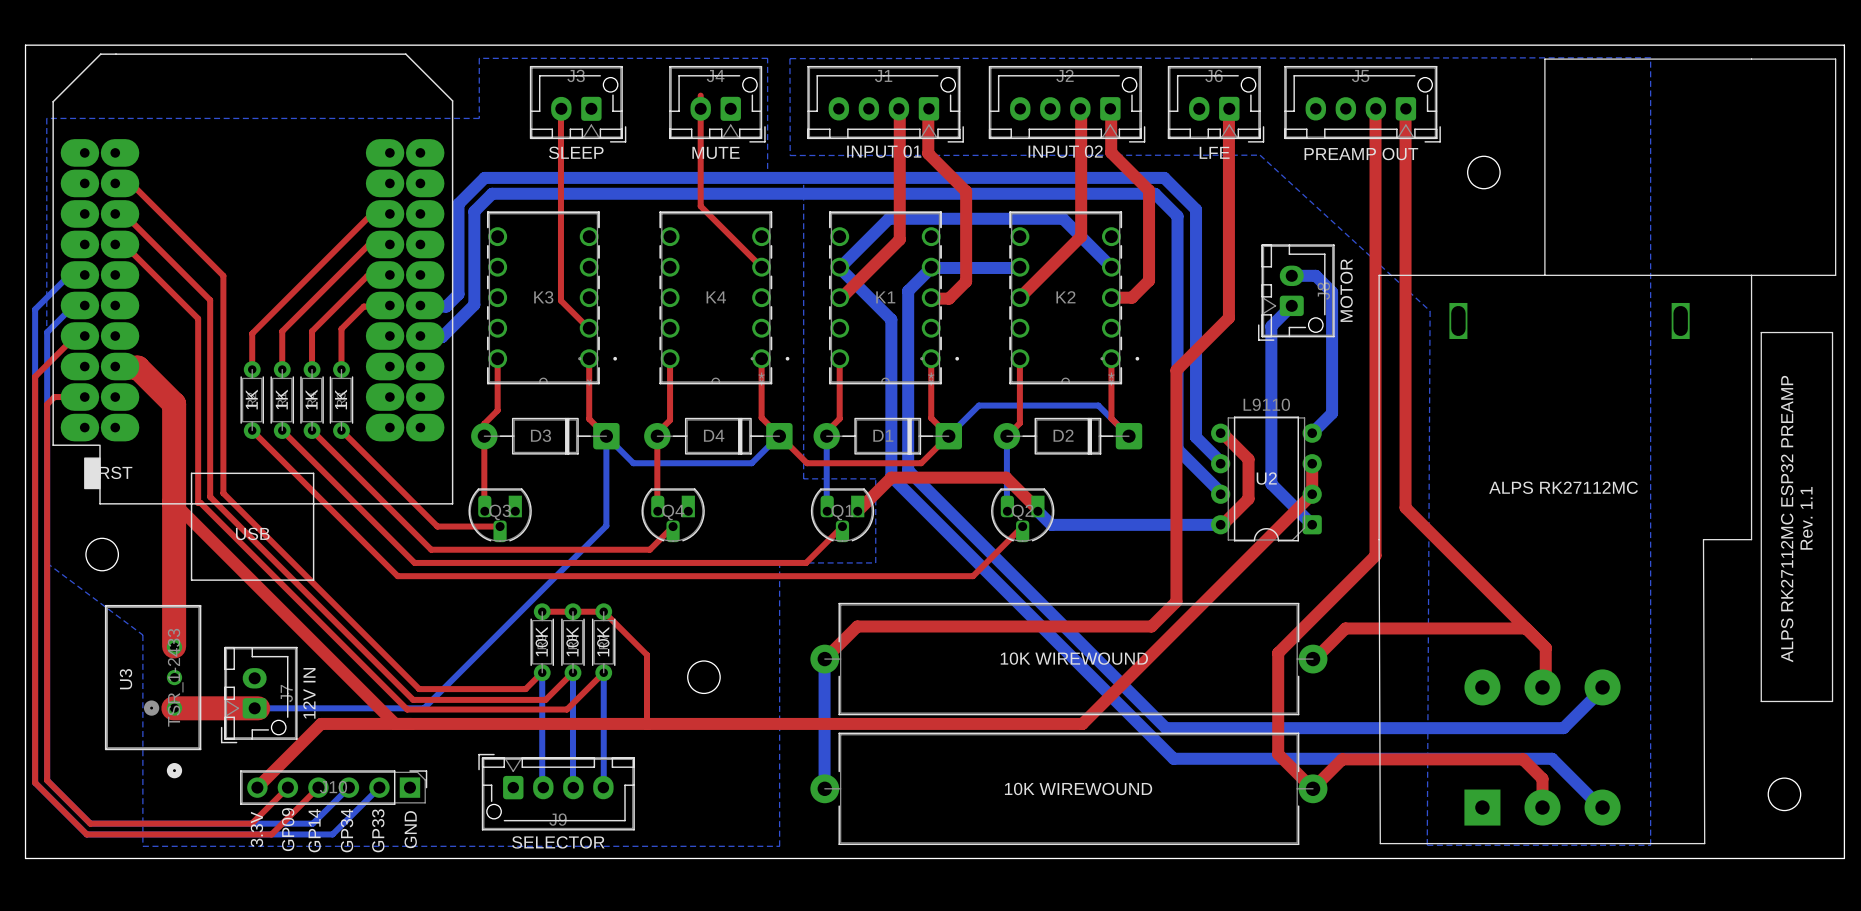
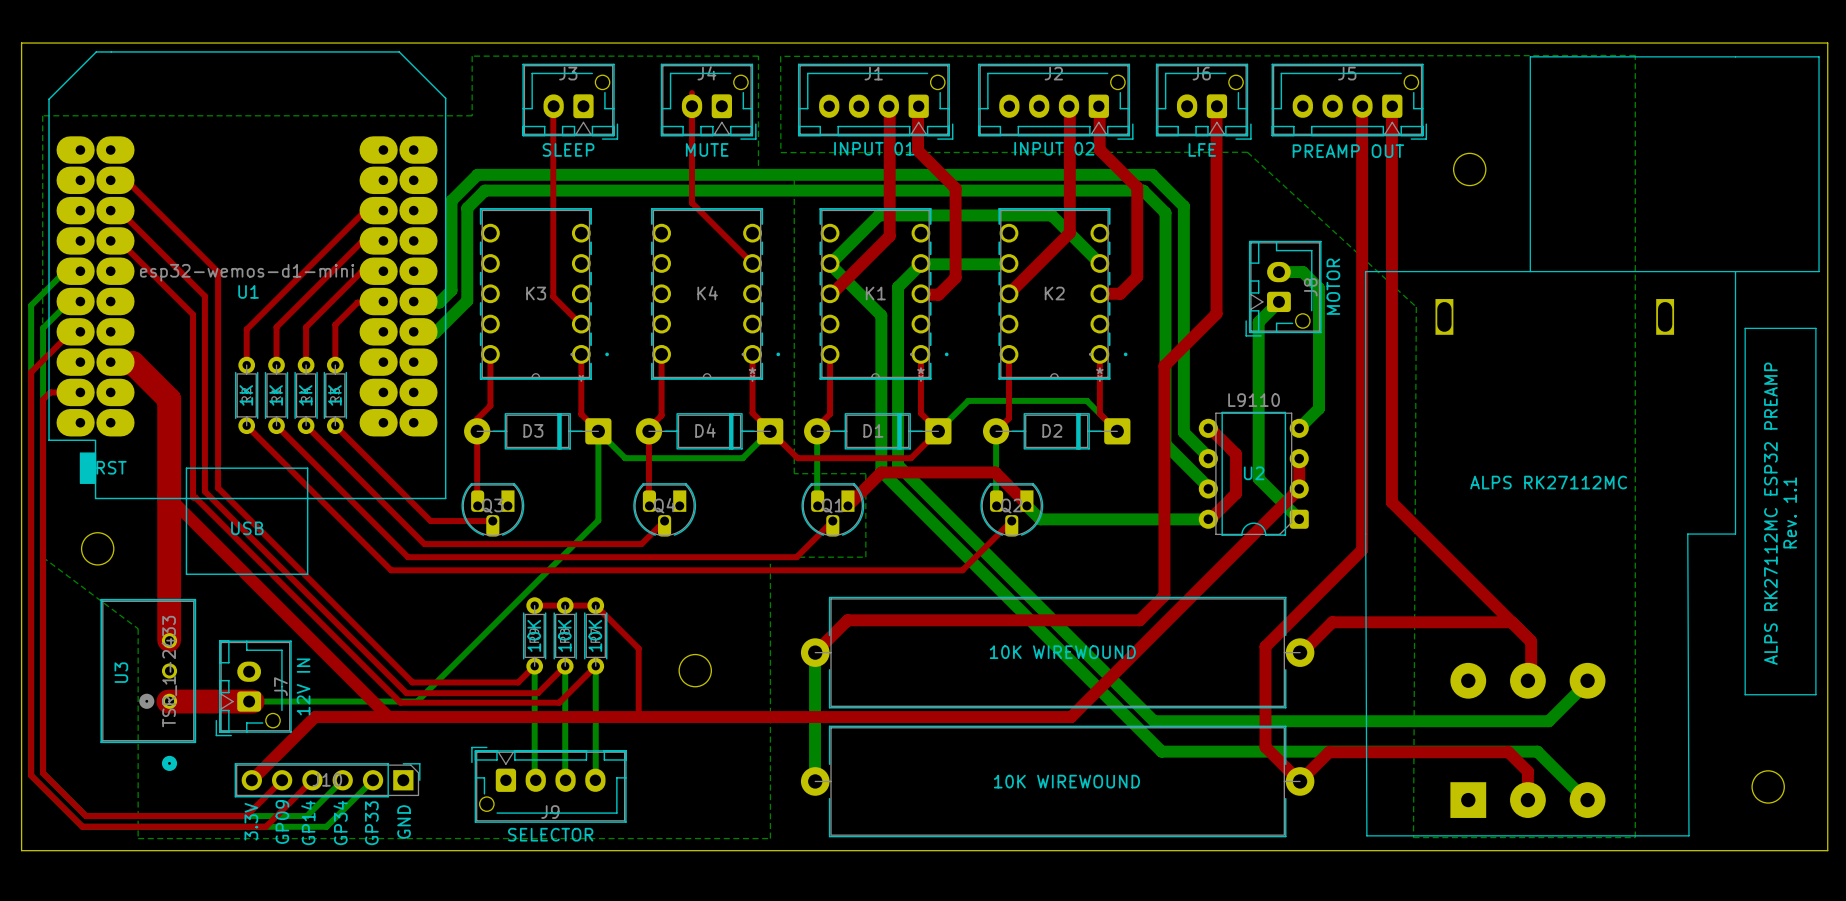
U1 value: none -> esp32-wemos-d1-mini (247, 272)
U1 name: none -> U1 (248, 291)

